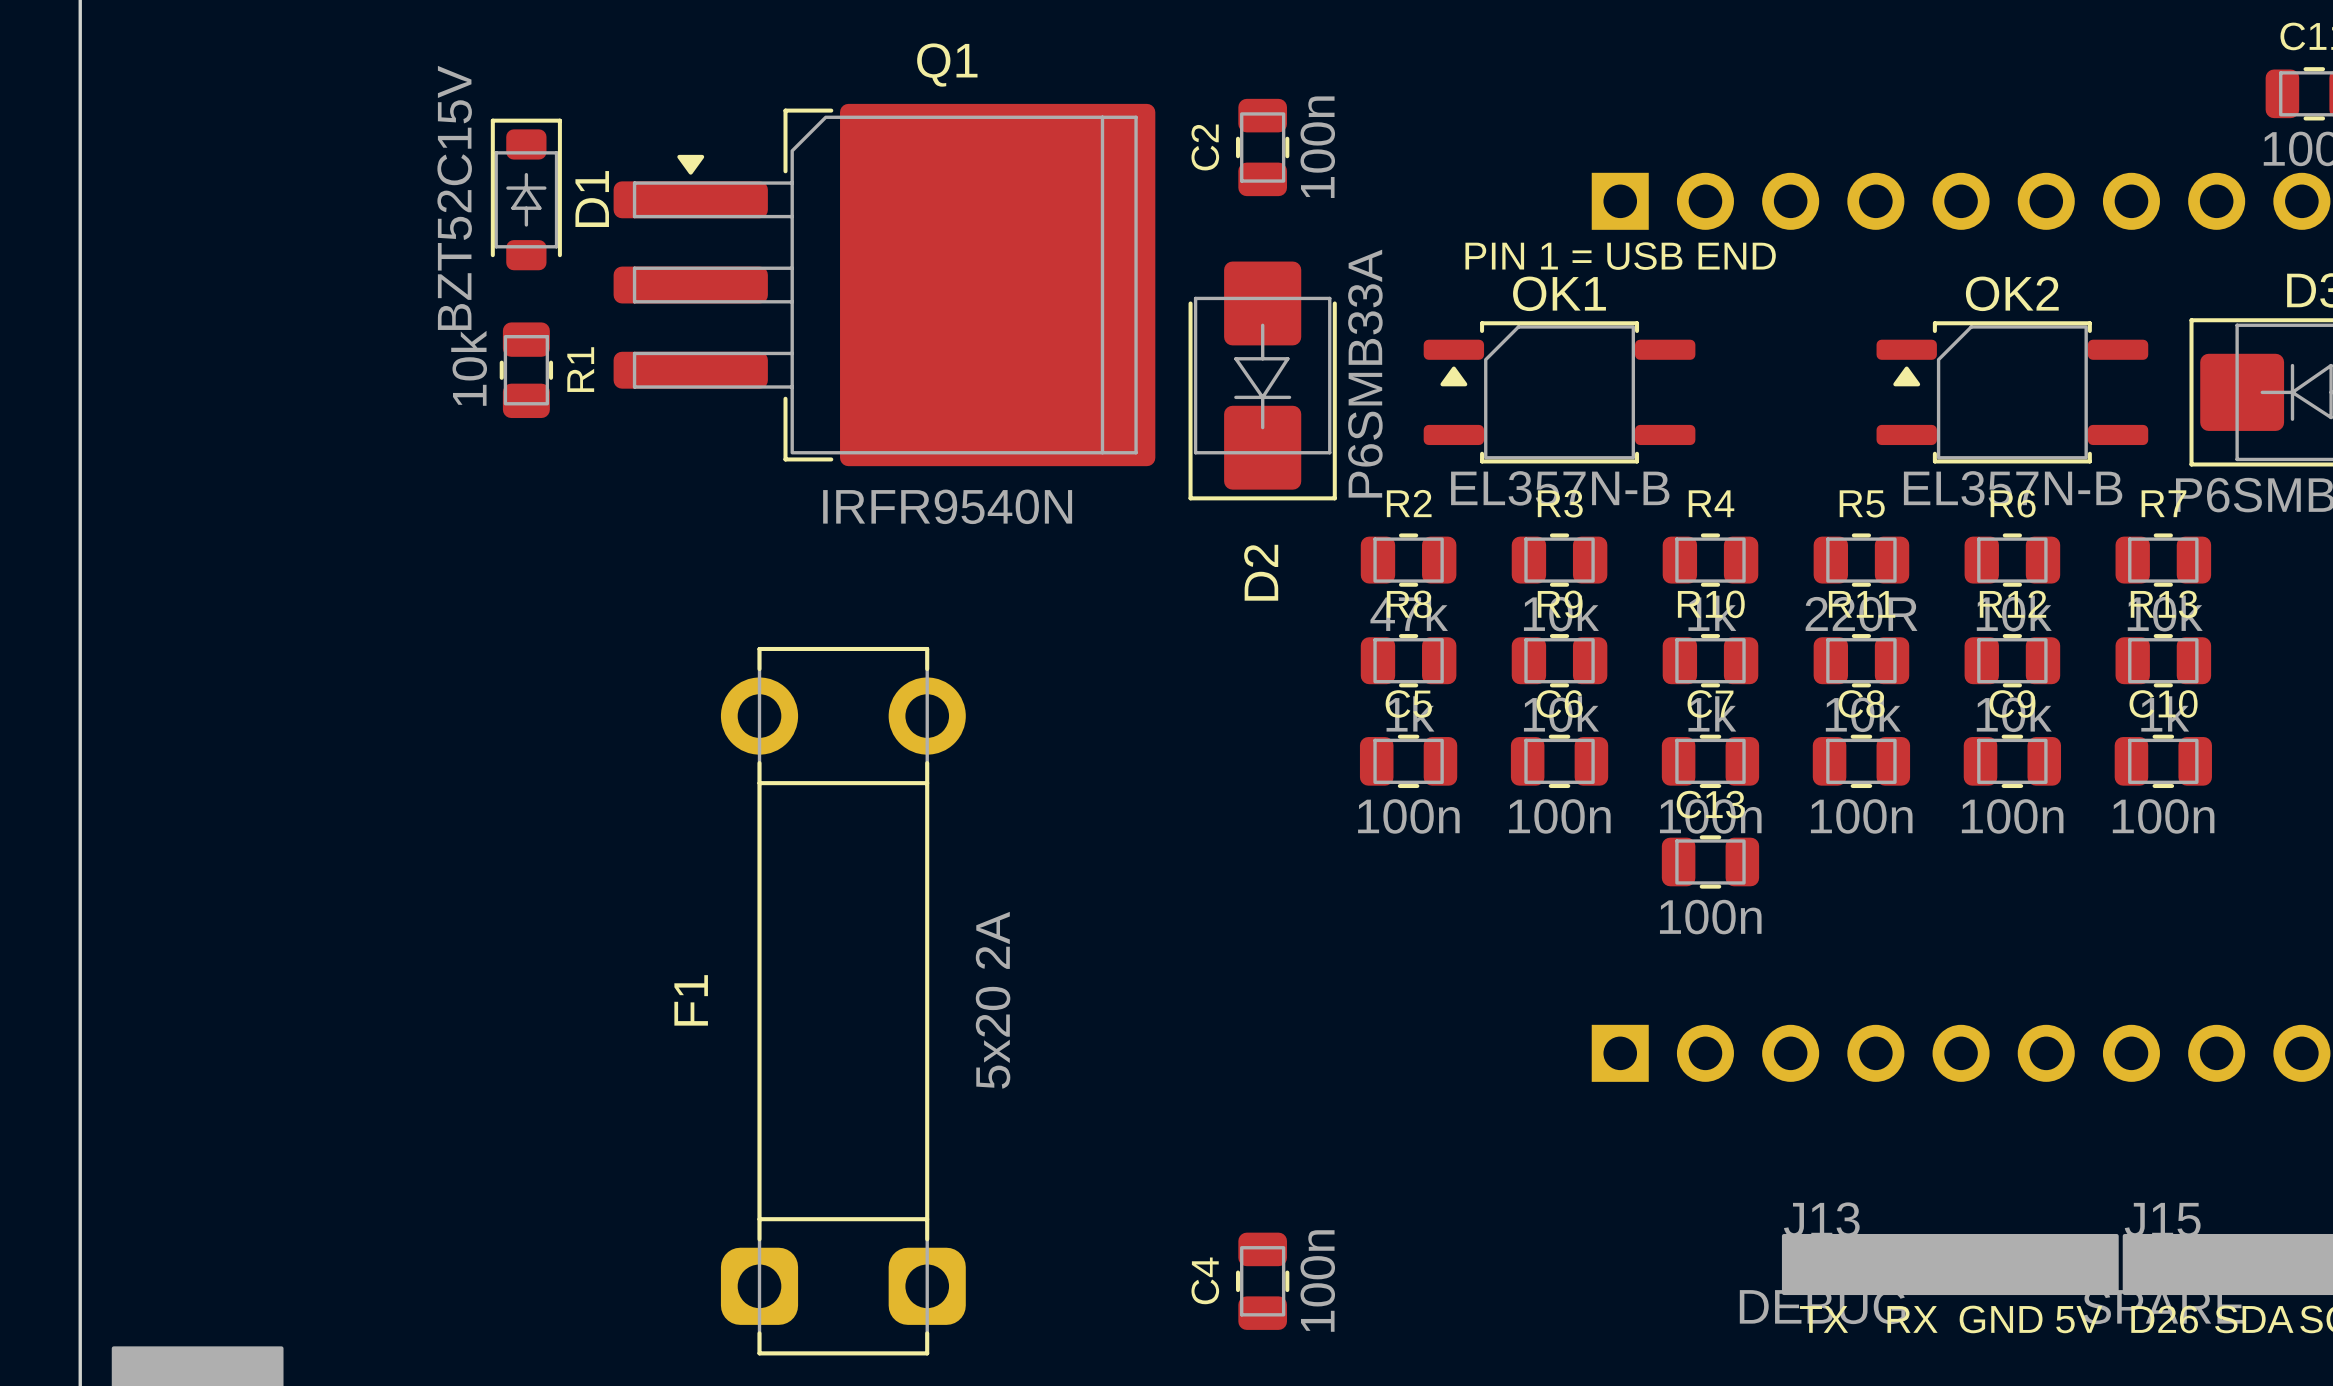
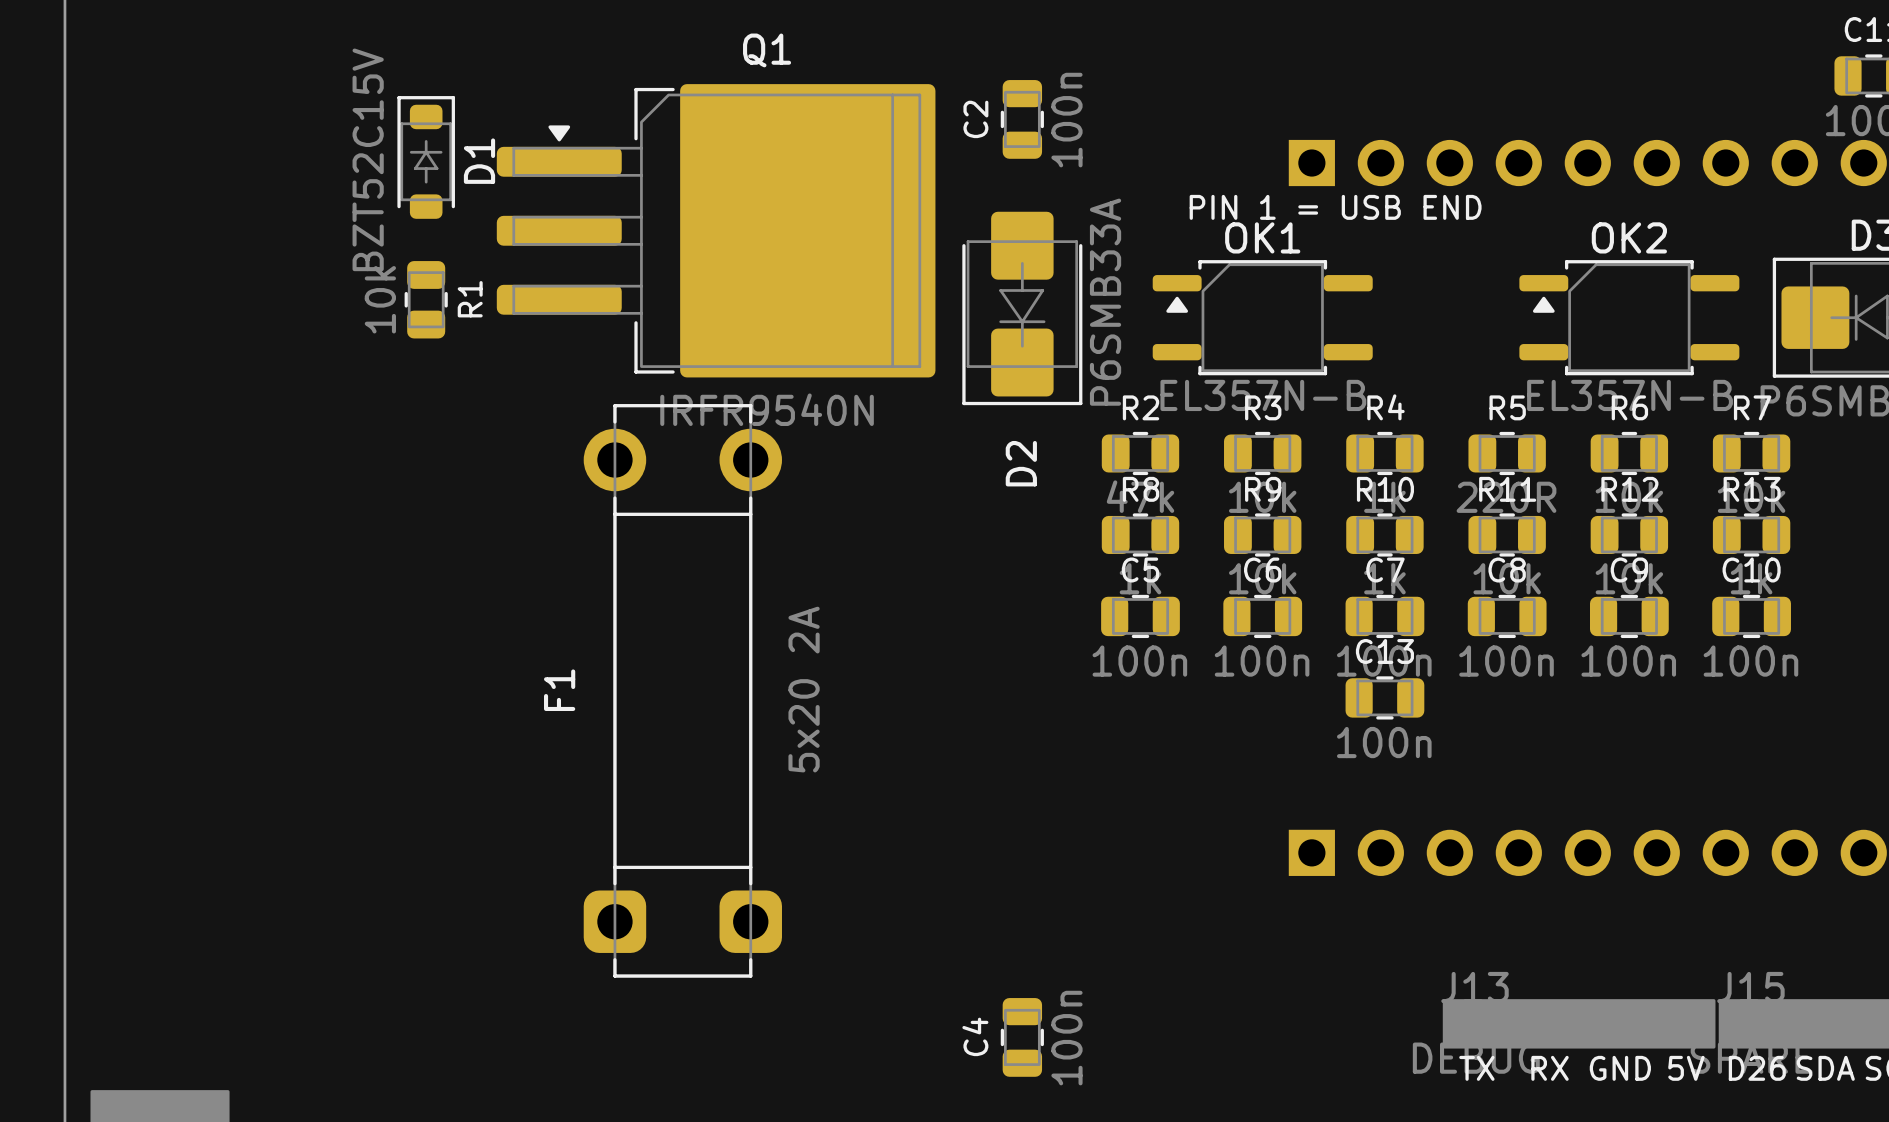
F1 position: (843, 1001) -> (682, 690)

